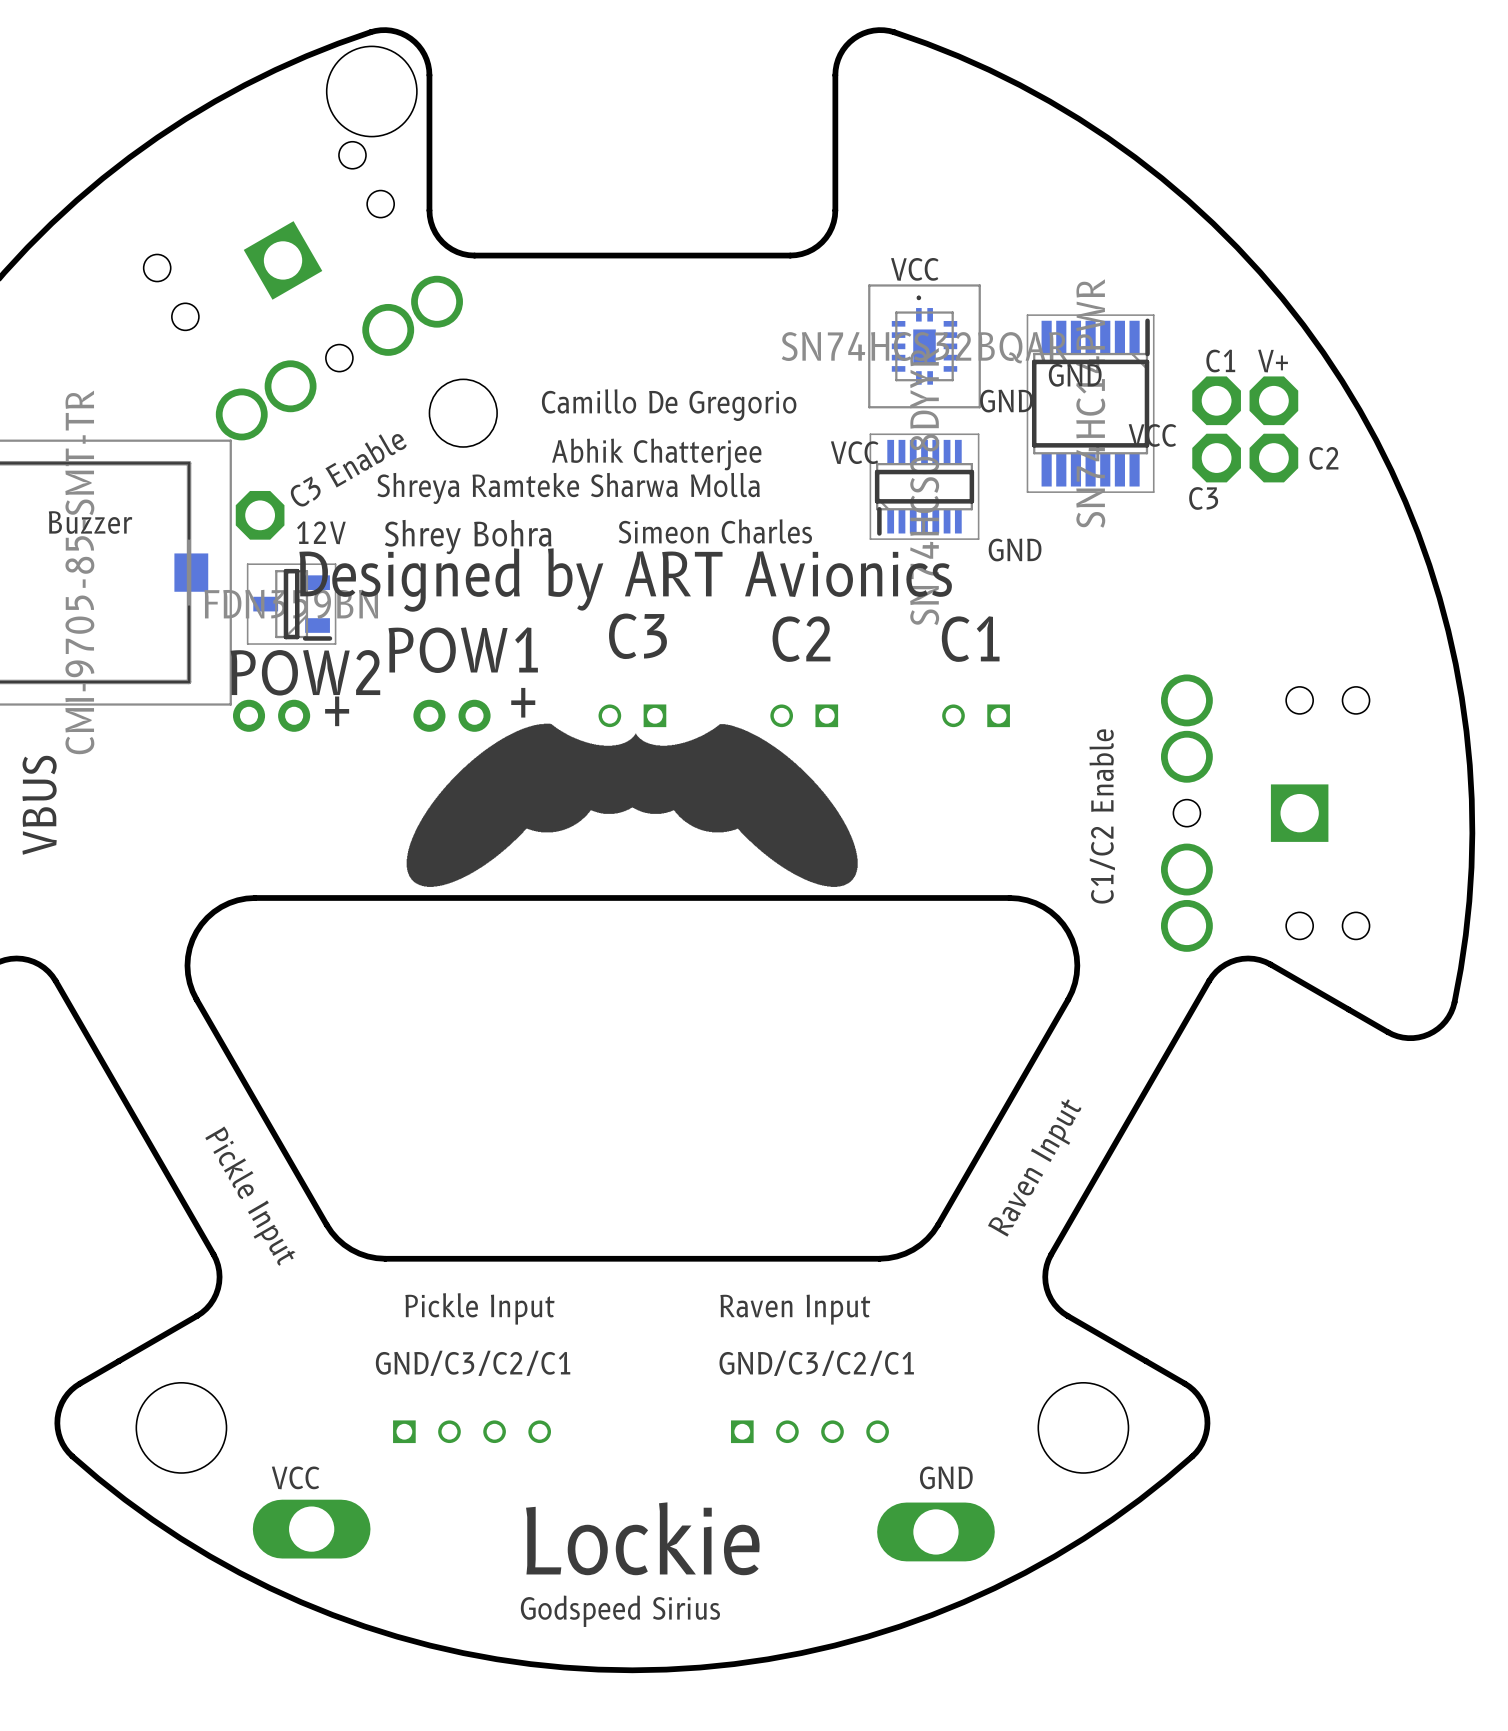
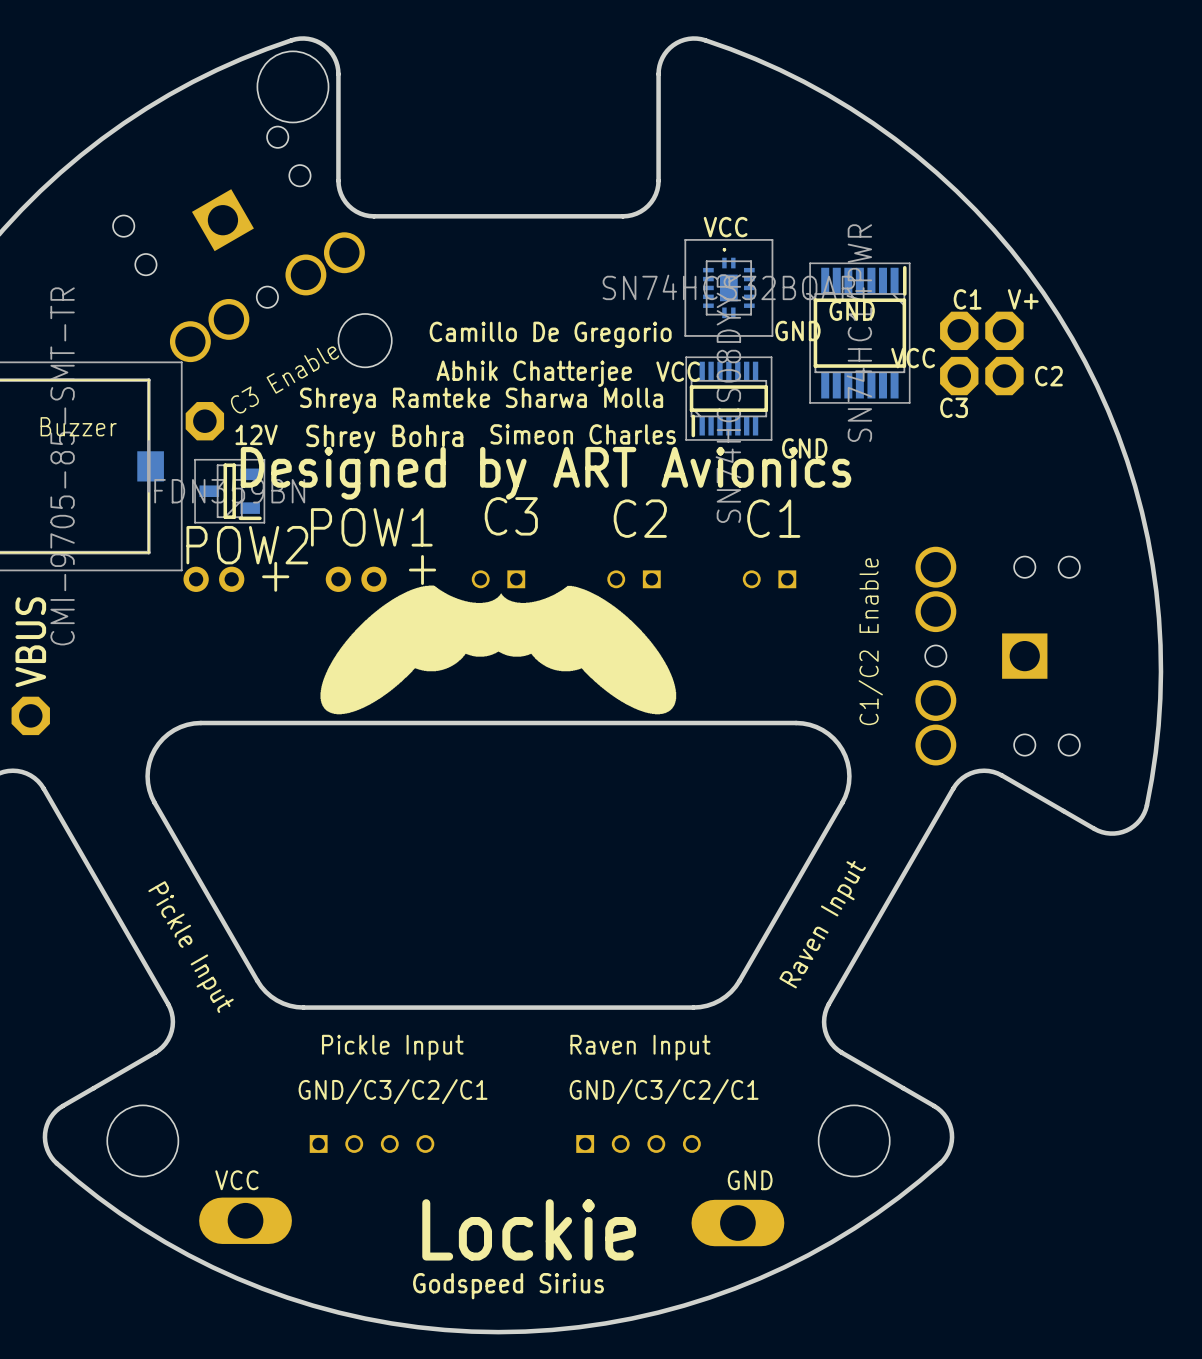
part: none -> (30, 715)

